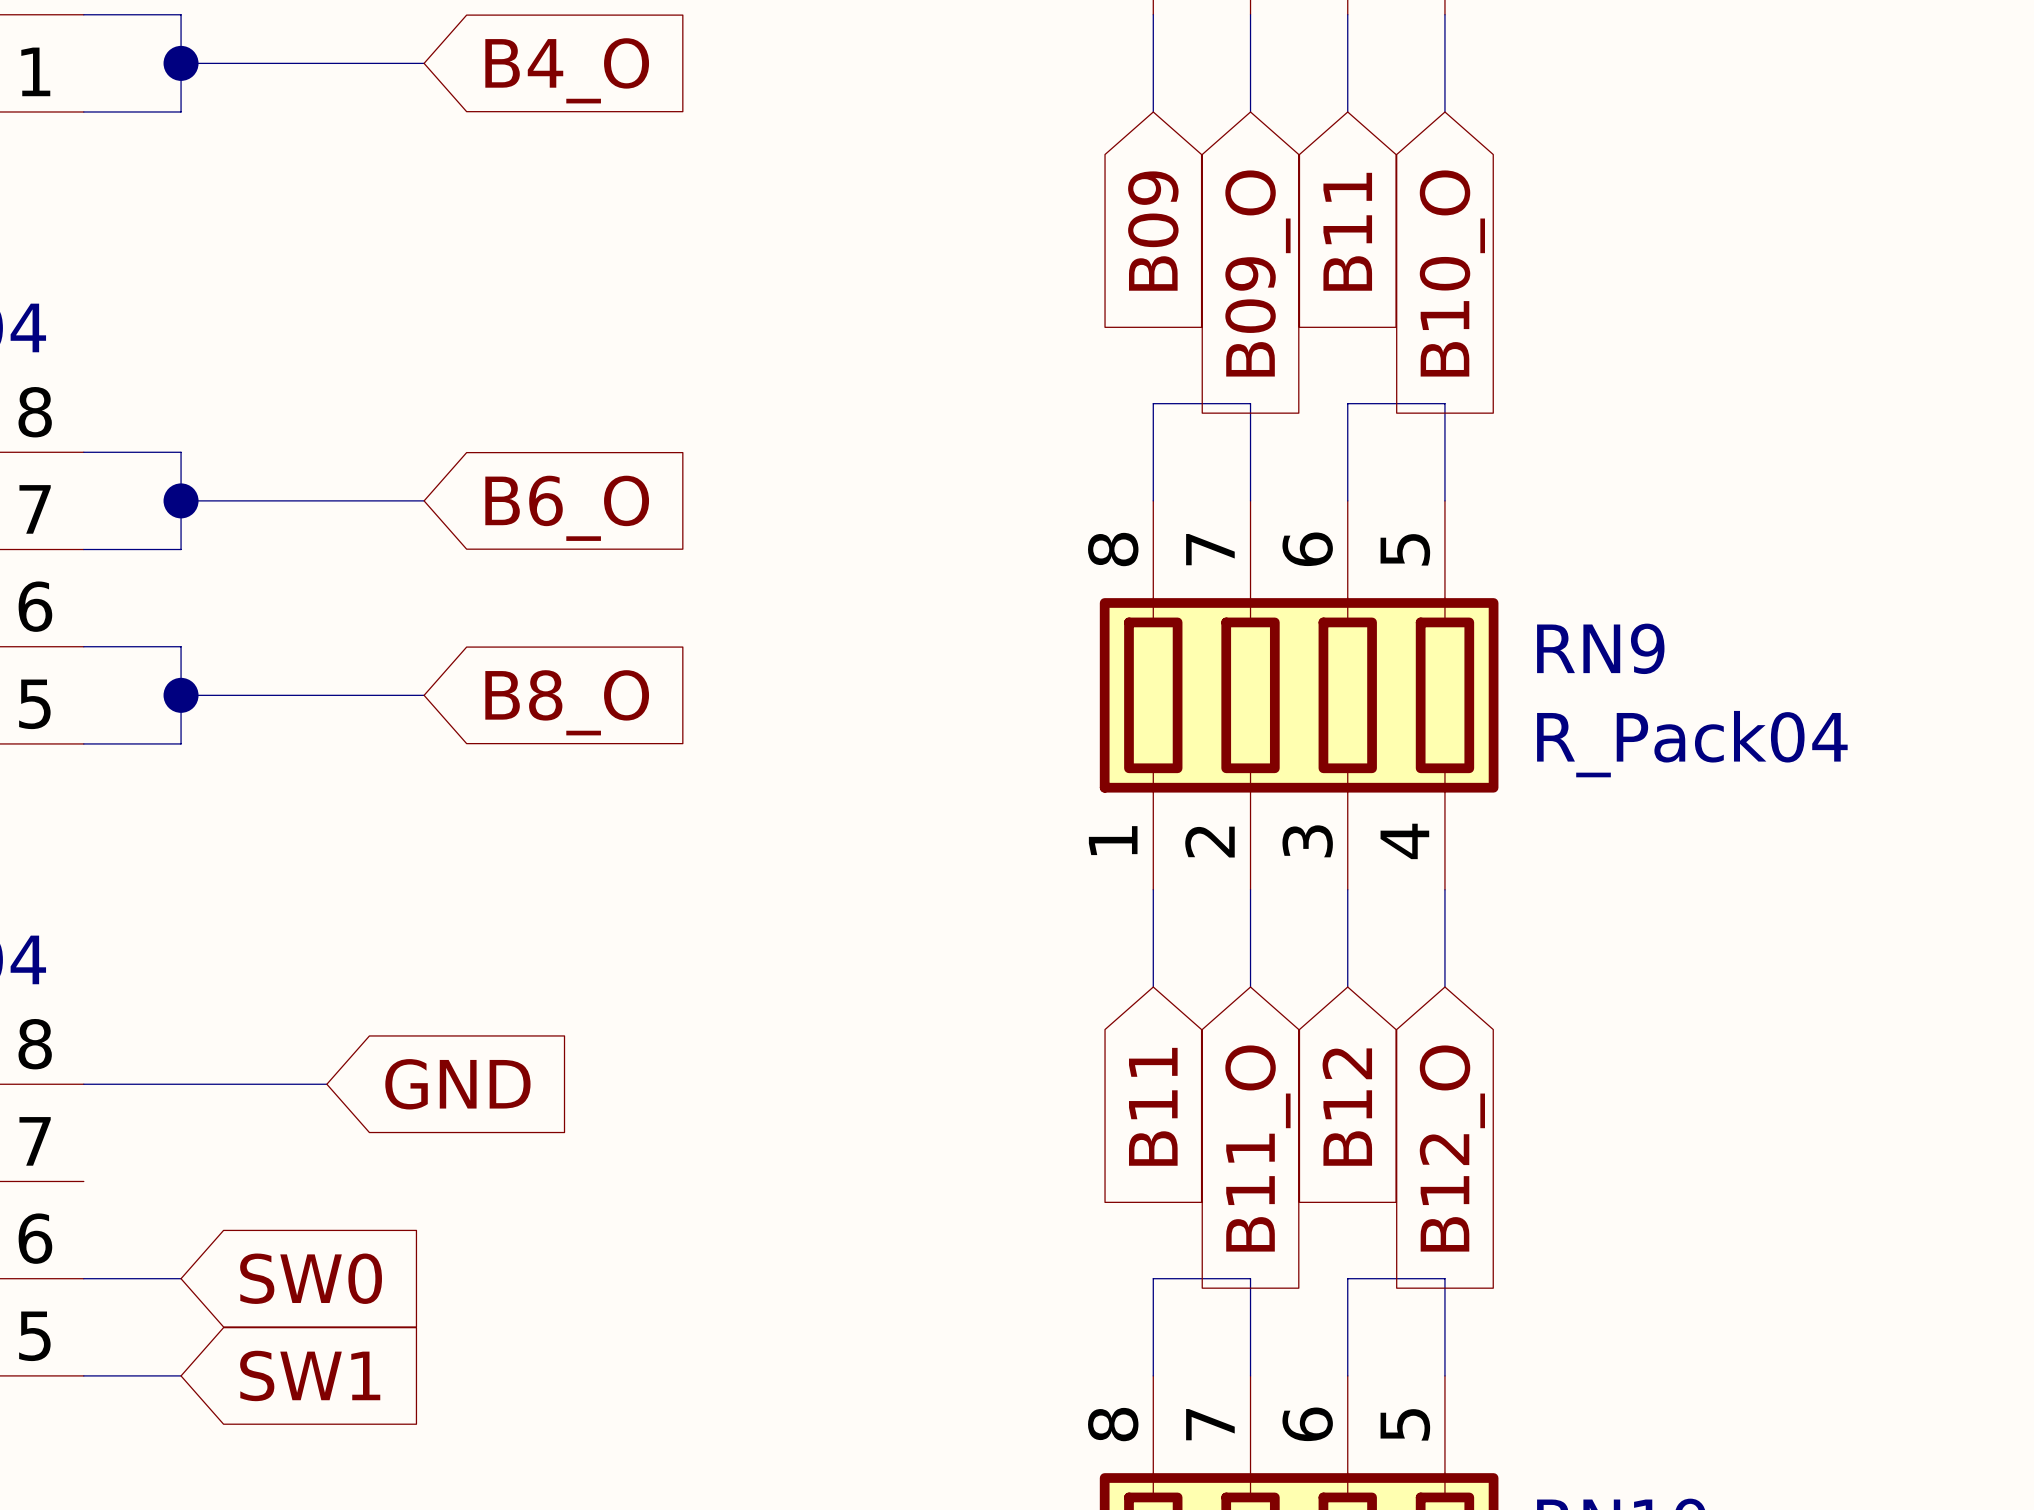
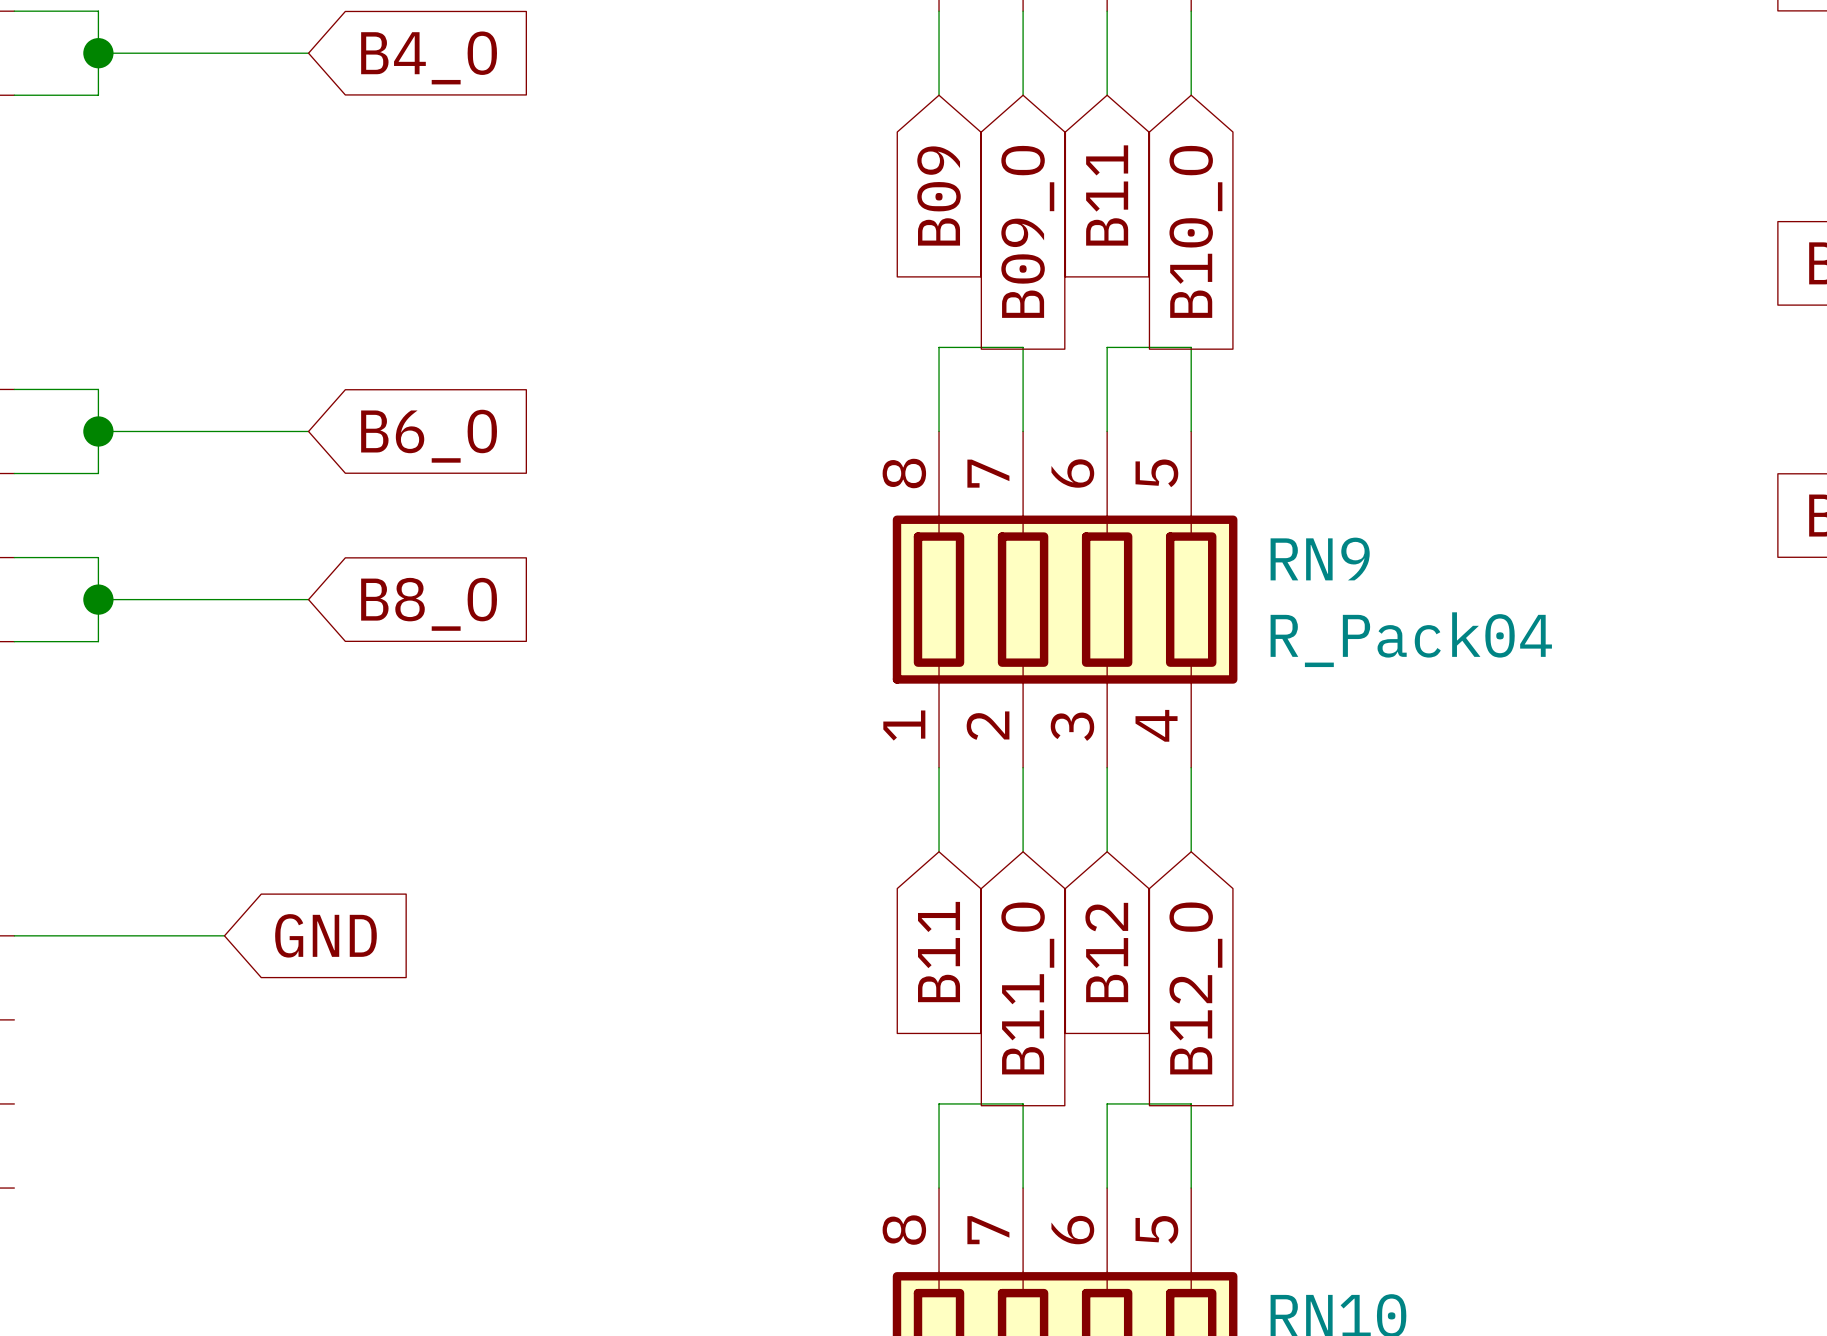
wire: (83, 1278) (181, 1278) -> none
global label: SW0 (311, 1278) -> none
wire: (83, 1375) (181, 1375) -> none
global label: SW1 (310, 1375) -> none

